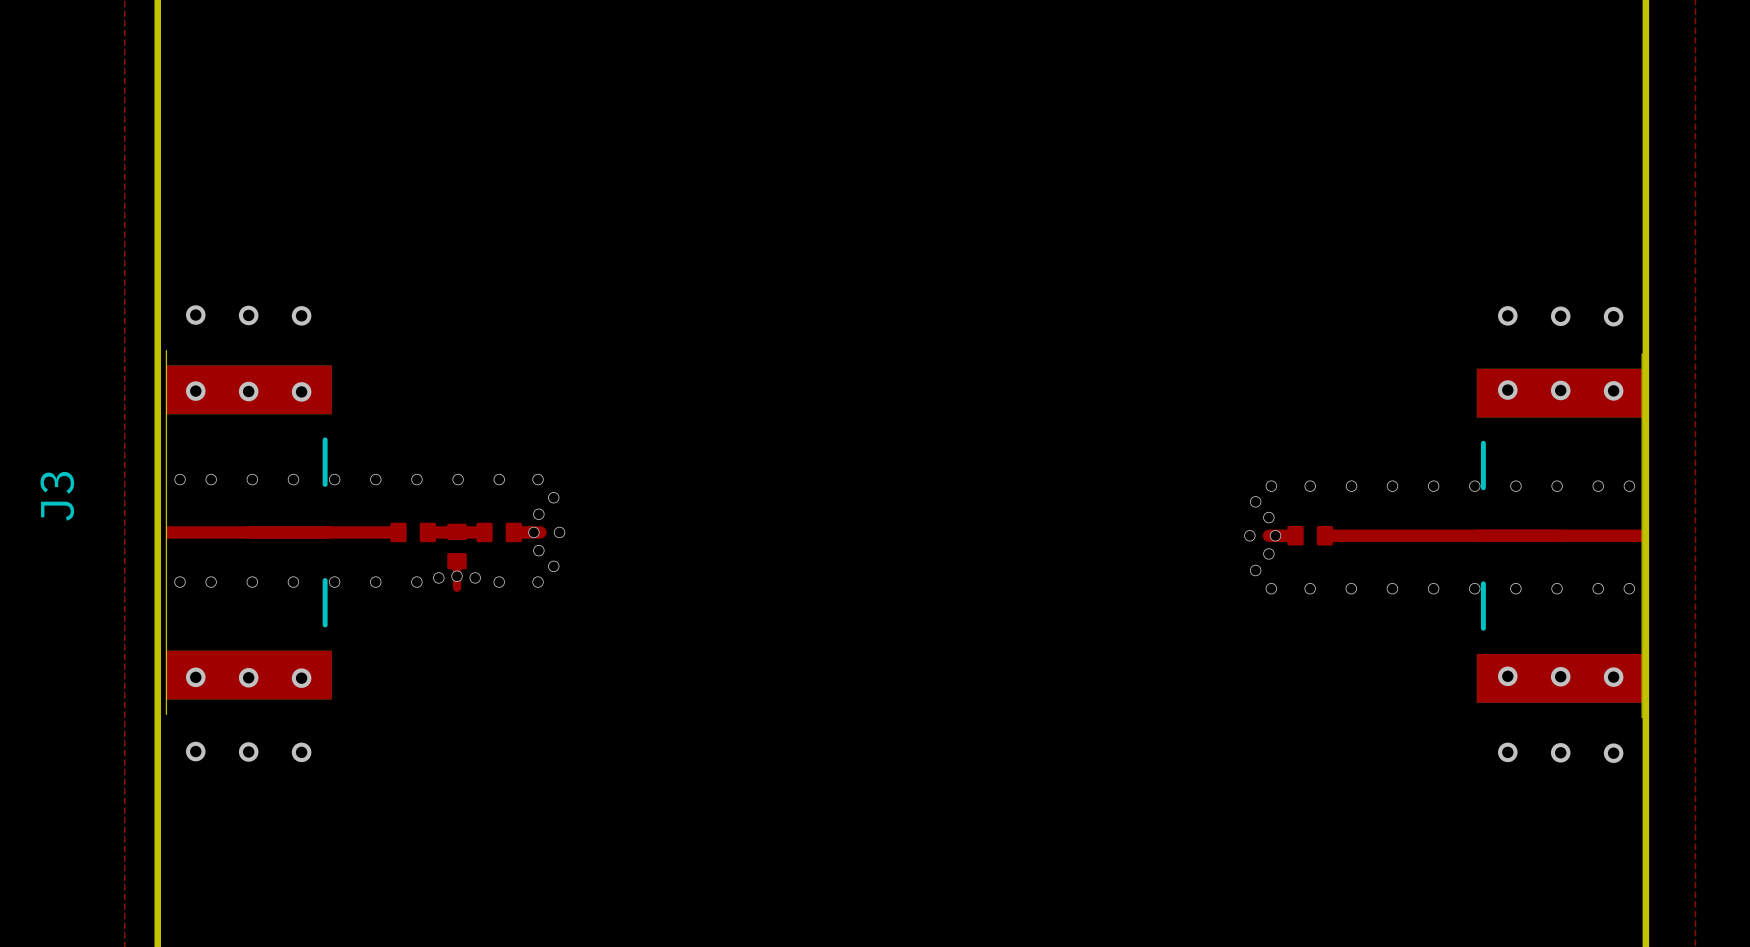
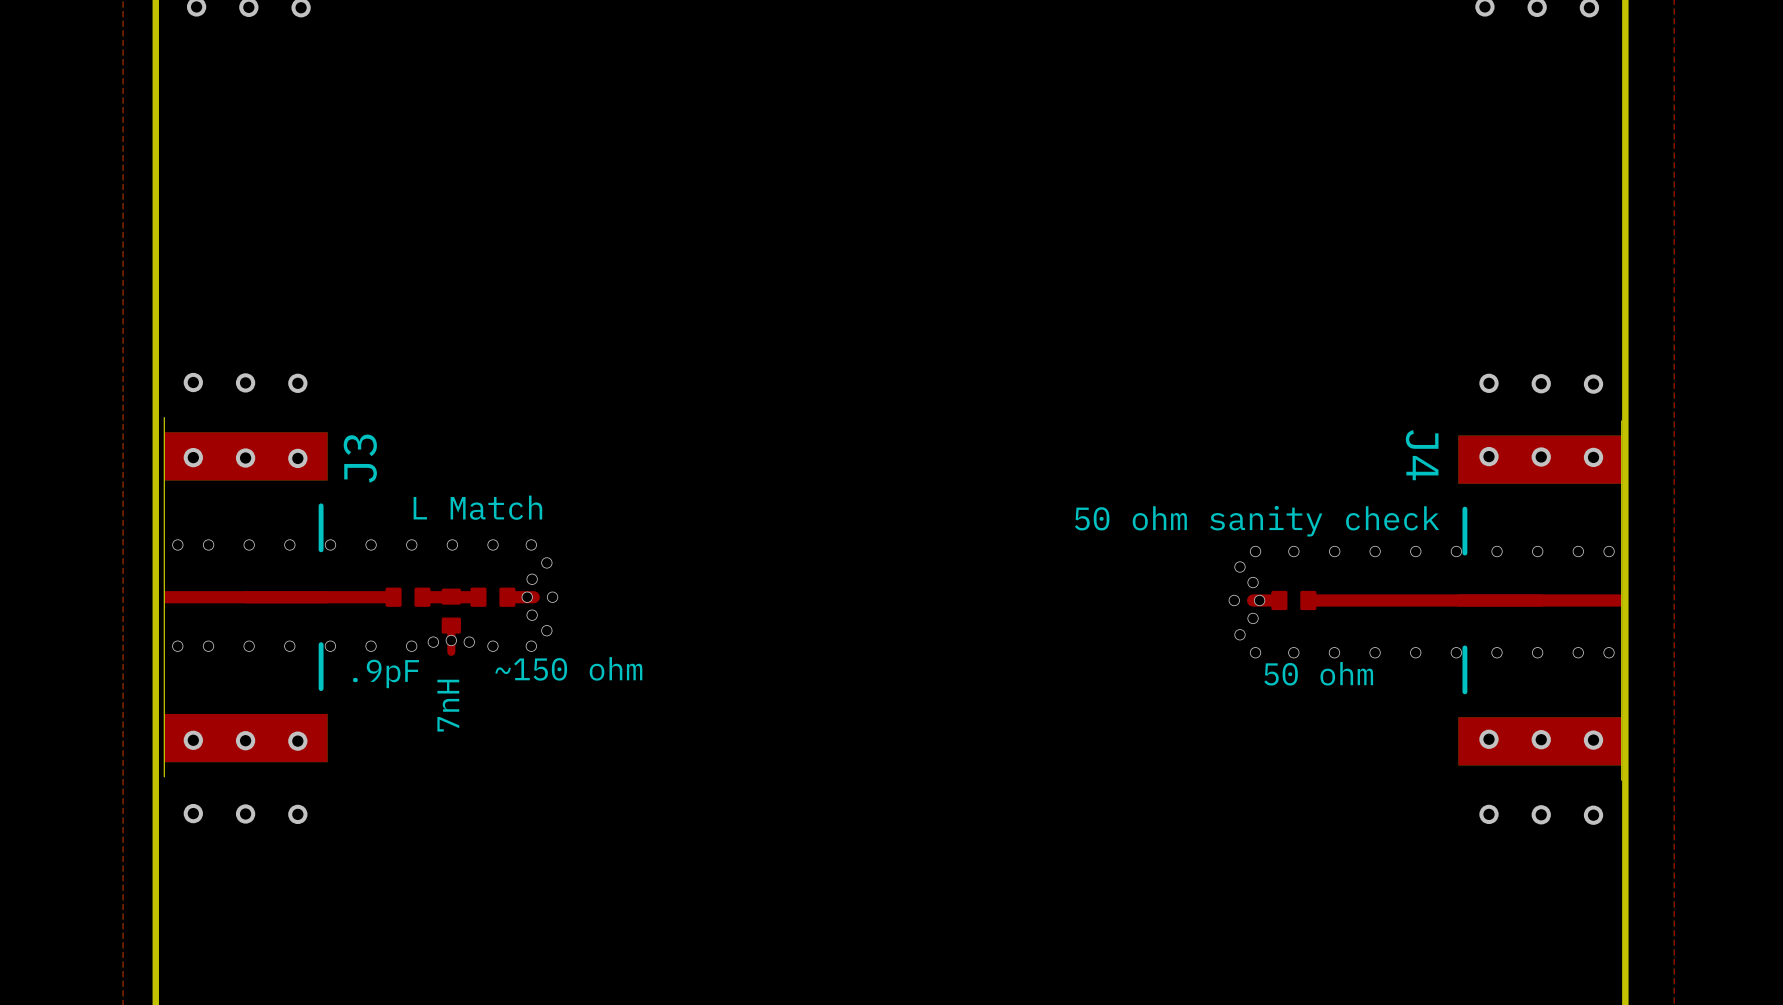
J4 name: none -> J4 (1422, 455)
text: none -> L Match (477, 507)
text: none -> 50 ohm sanity check (1257, 521)
J3 name position: J3 (57, 496) -> J3 (360, 458)
part value: none -> ~150 ohm (568, 668)
part value: none -> 50 ohm (1318, 673)
part value: none -> .9pF (386, 673)
part value: none -> 7nH (448, 705)

